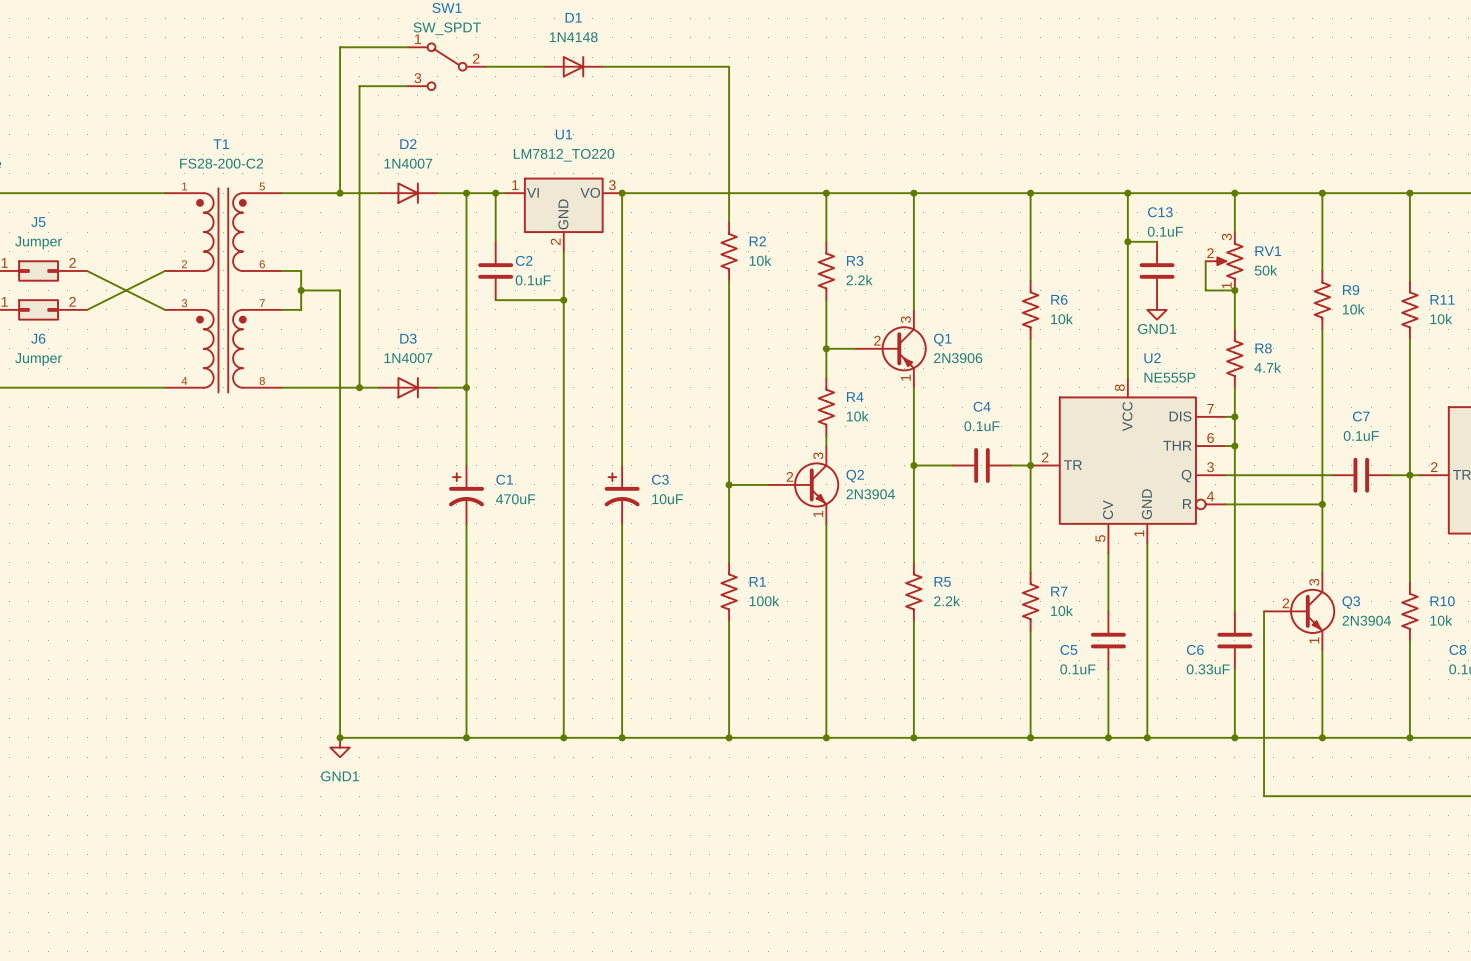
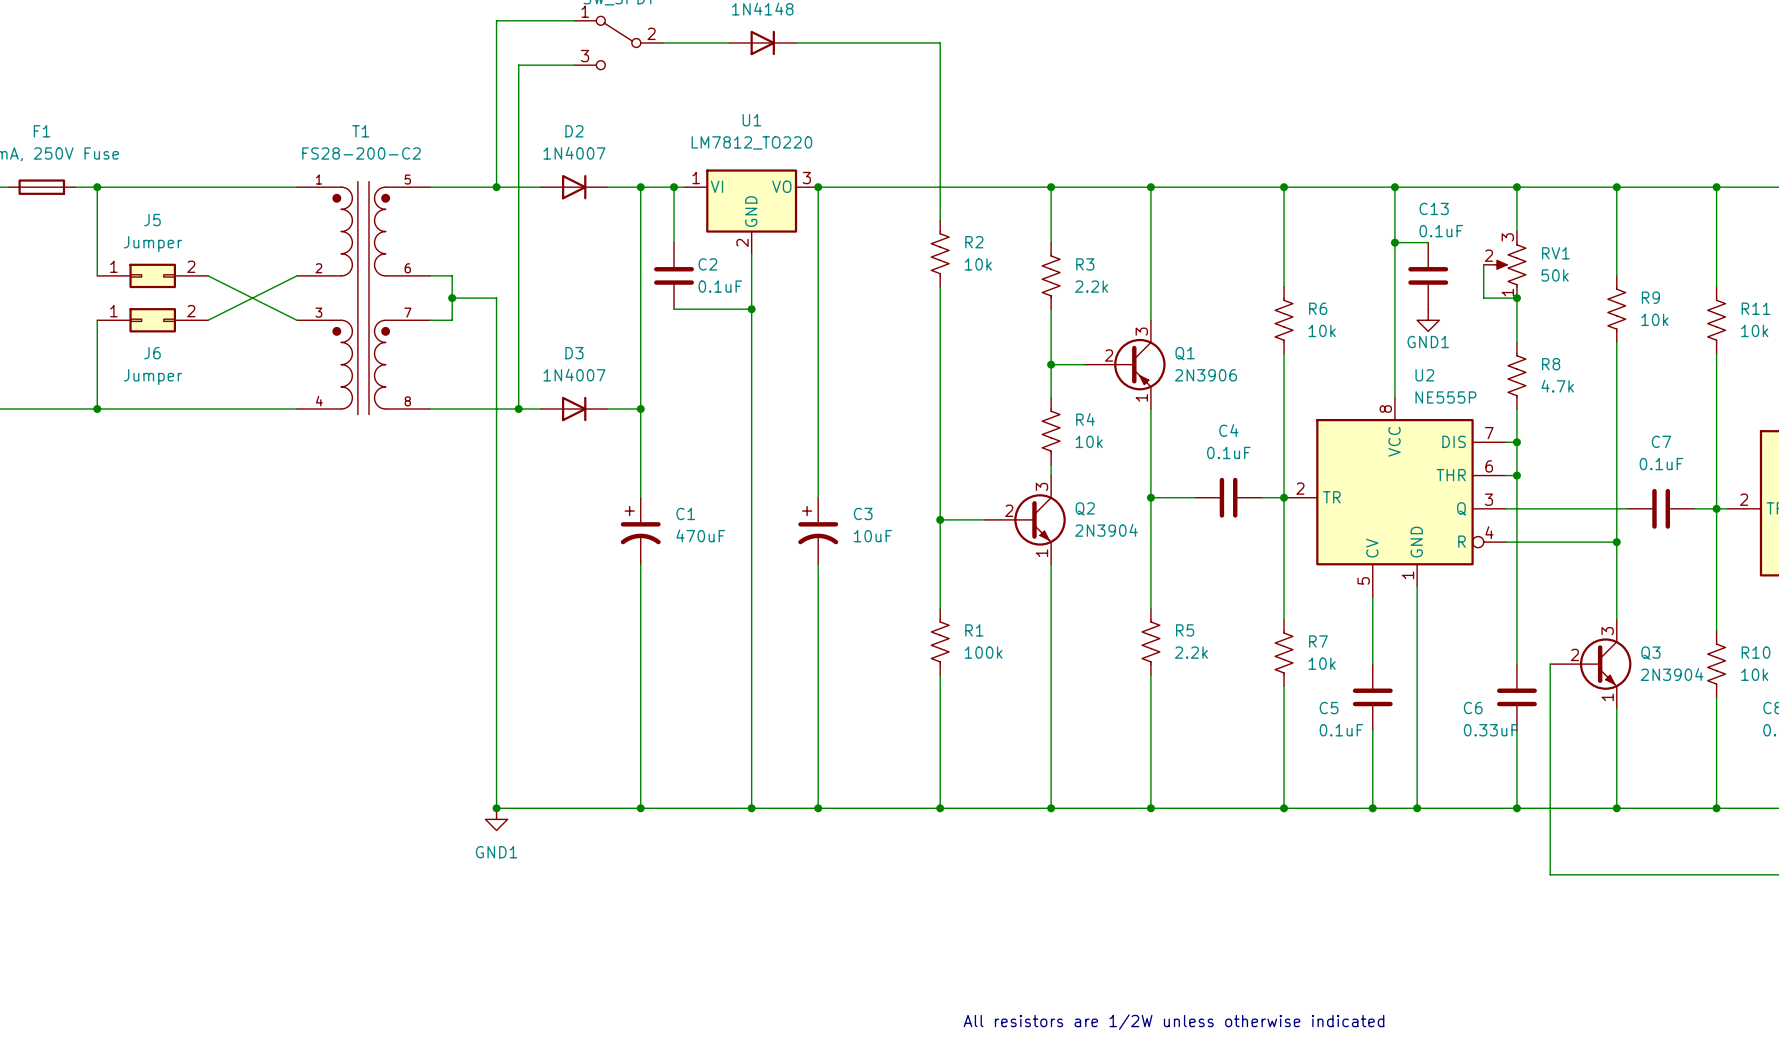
text: none -> All resistors are 1/2W unless otherwise indicated (1174, 1022)

